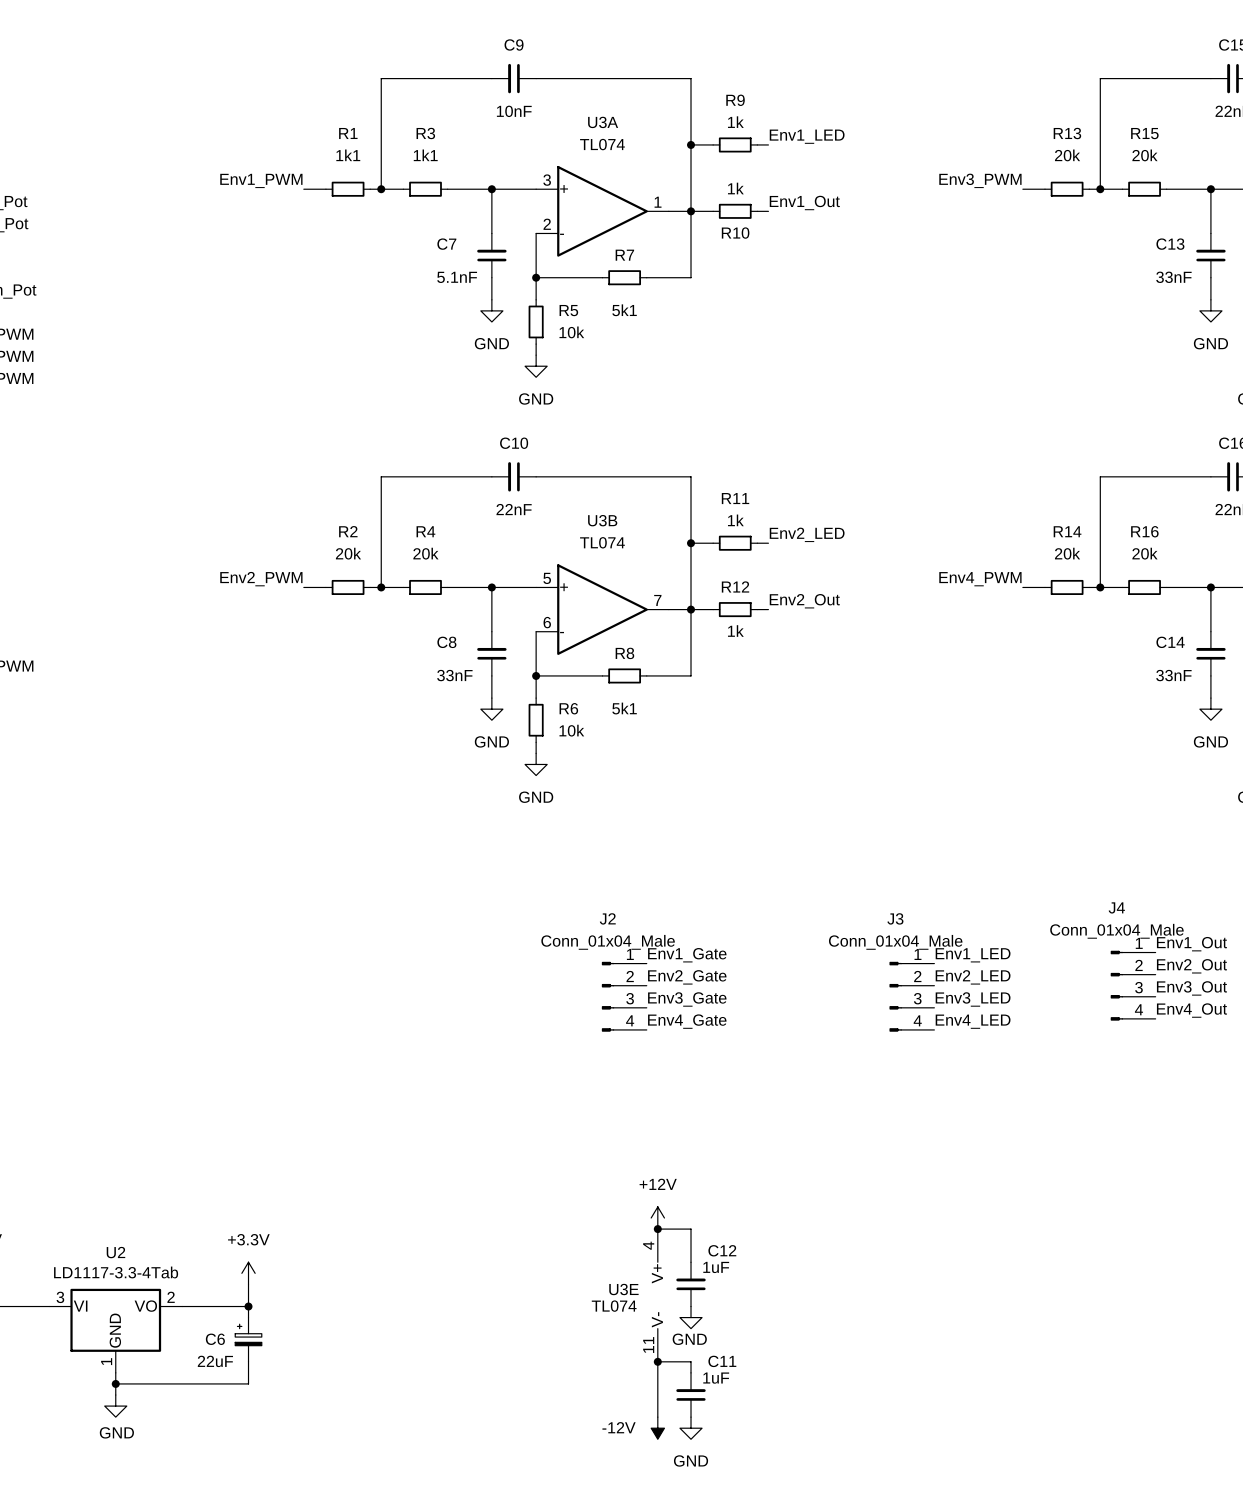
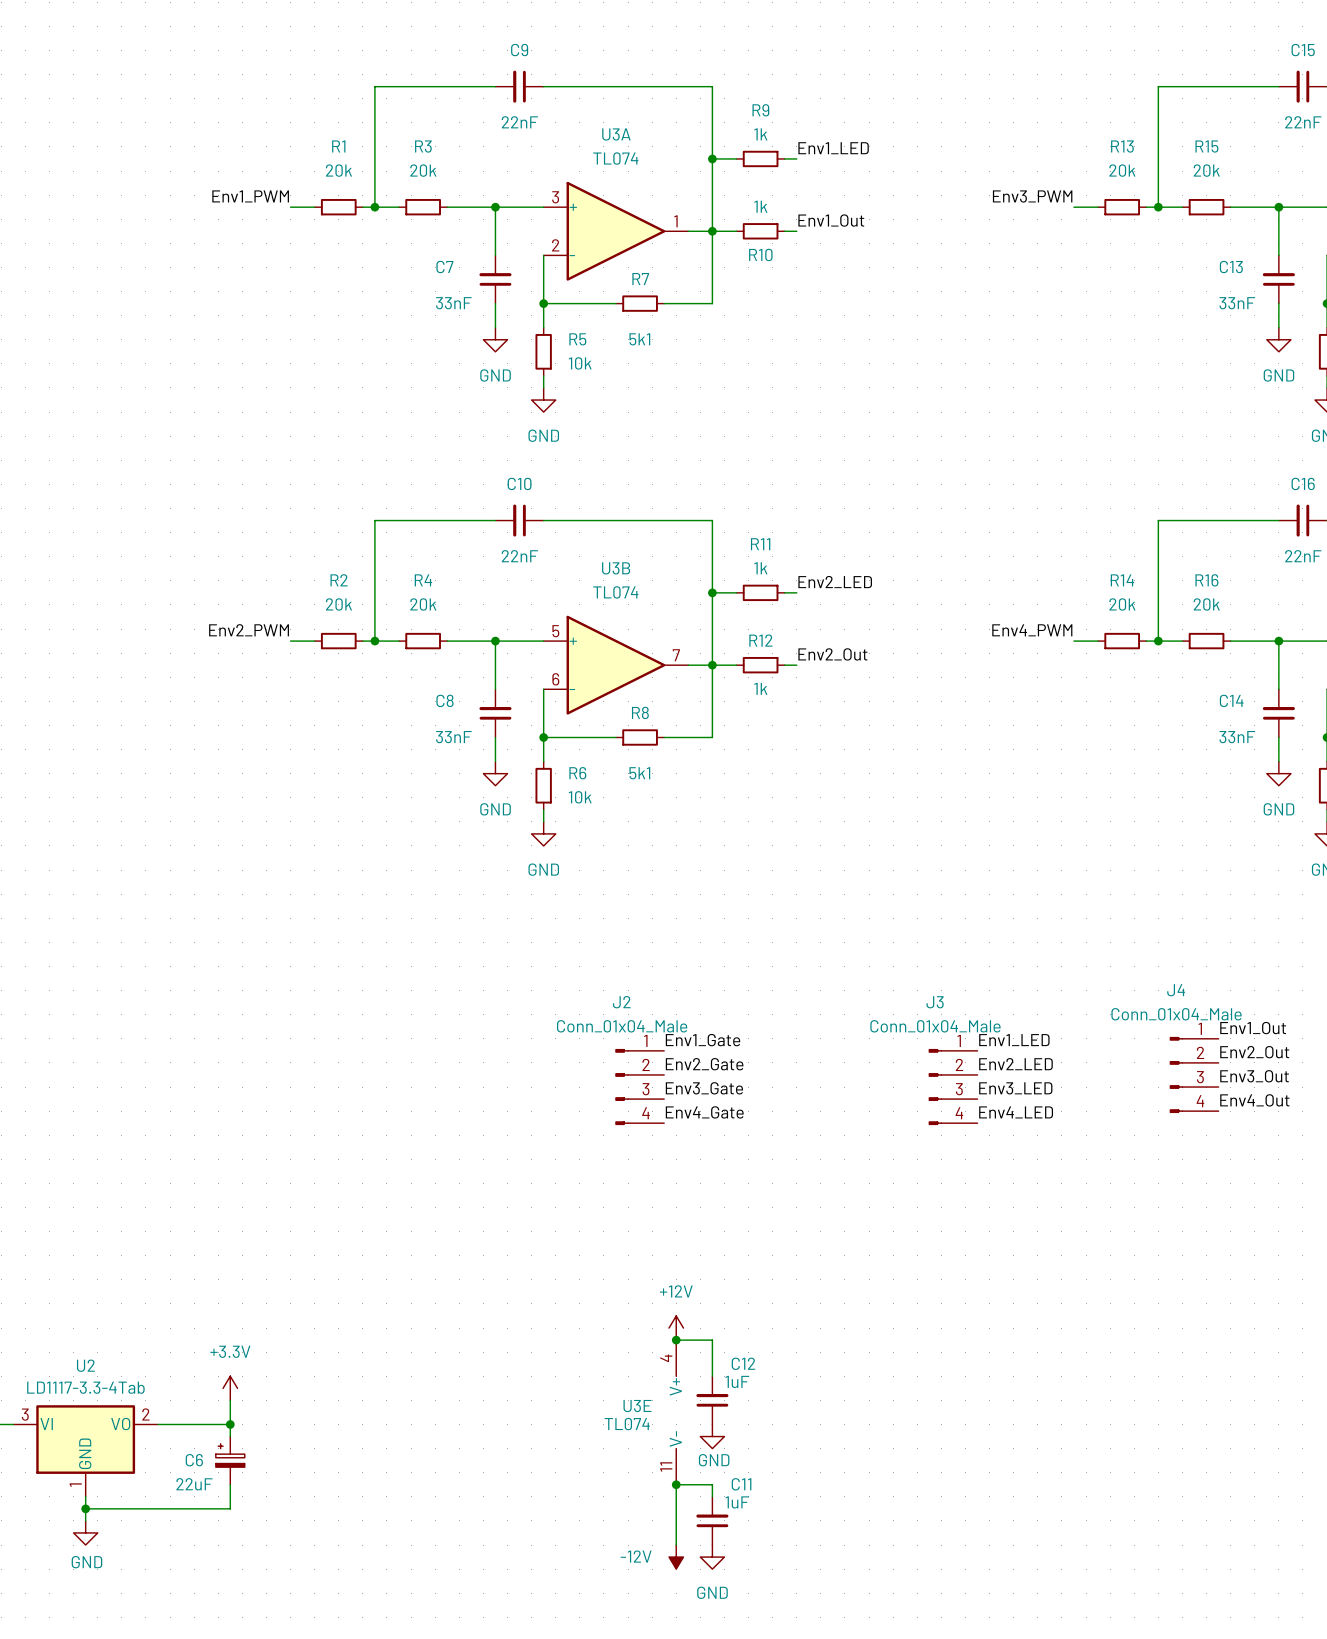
C9 value: 10nF (514, 111) -> 22nF (519, 122)
R1 value: 1k1 (348, 155) -> 20k (339, 170)
R3 value: 1k1 (425, 155) -> 20k (423, 170)
C7 value: 5.1nF (457, 277) -> 33nF (453, 303)

